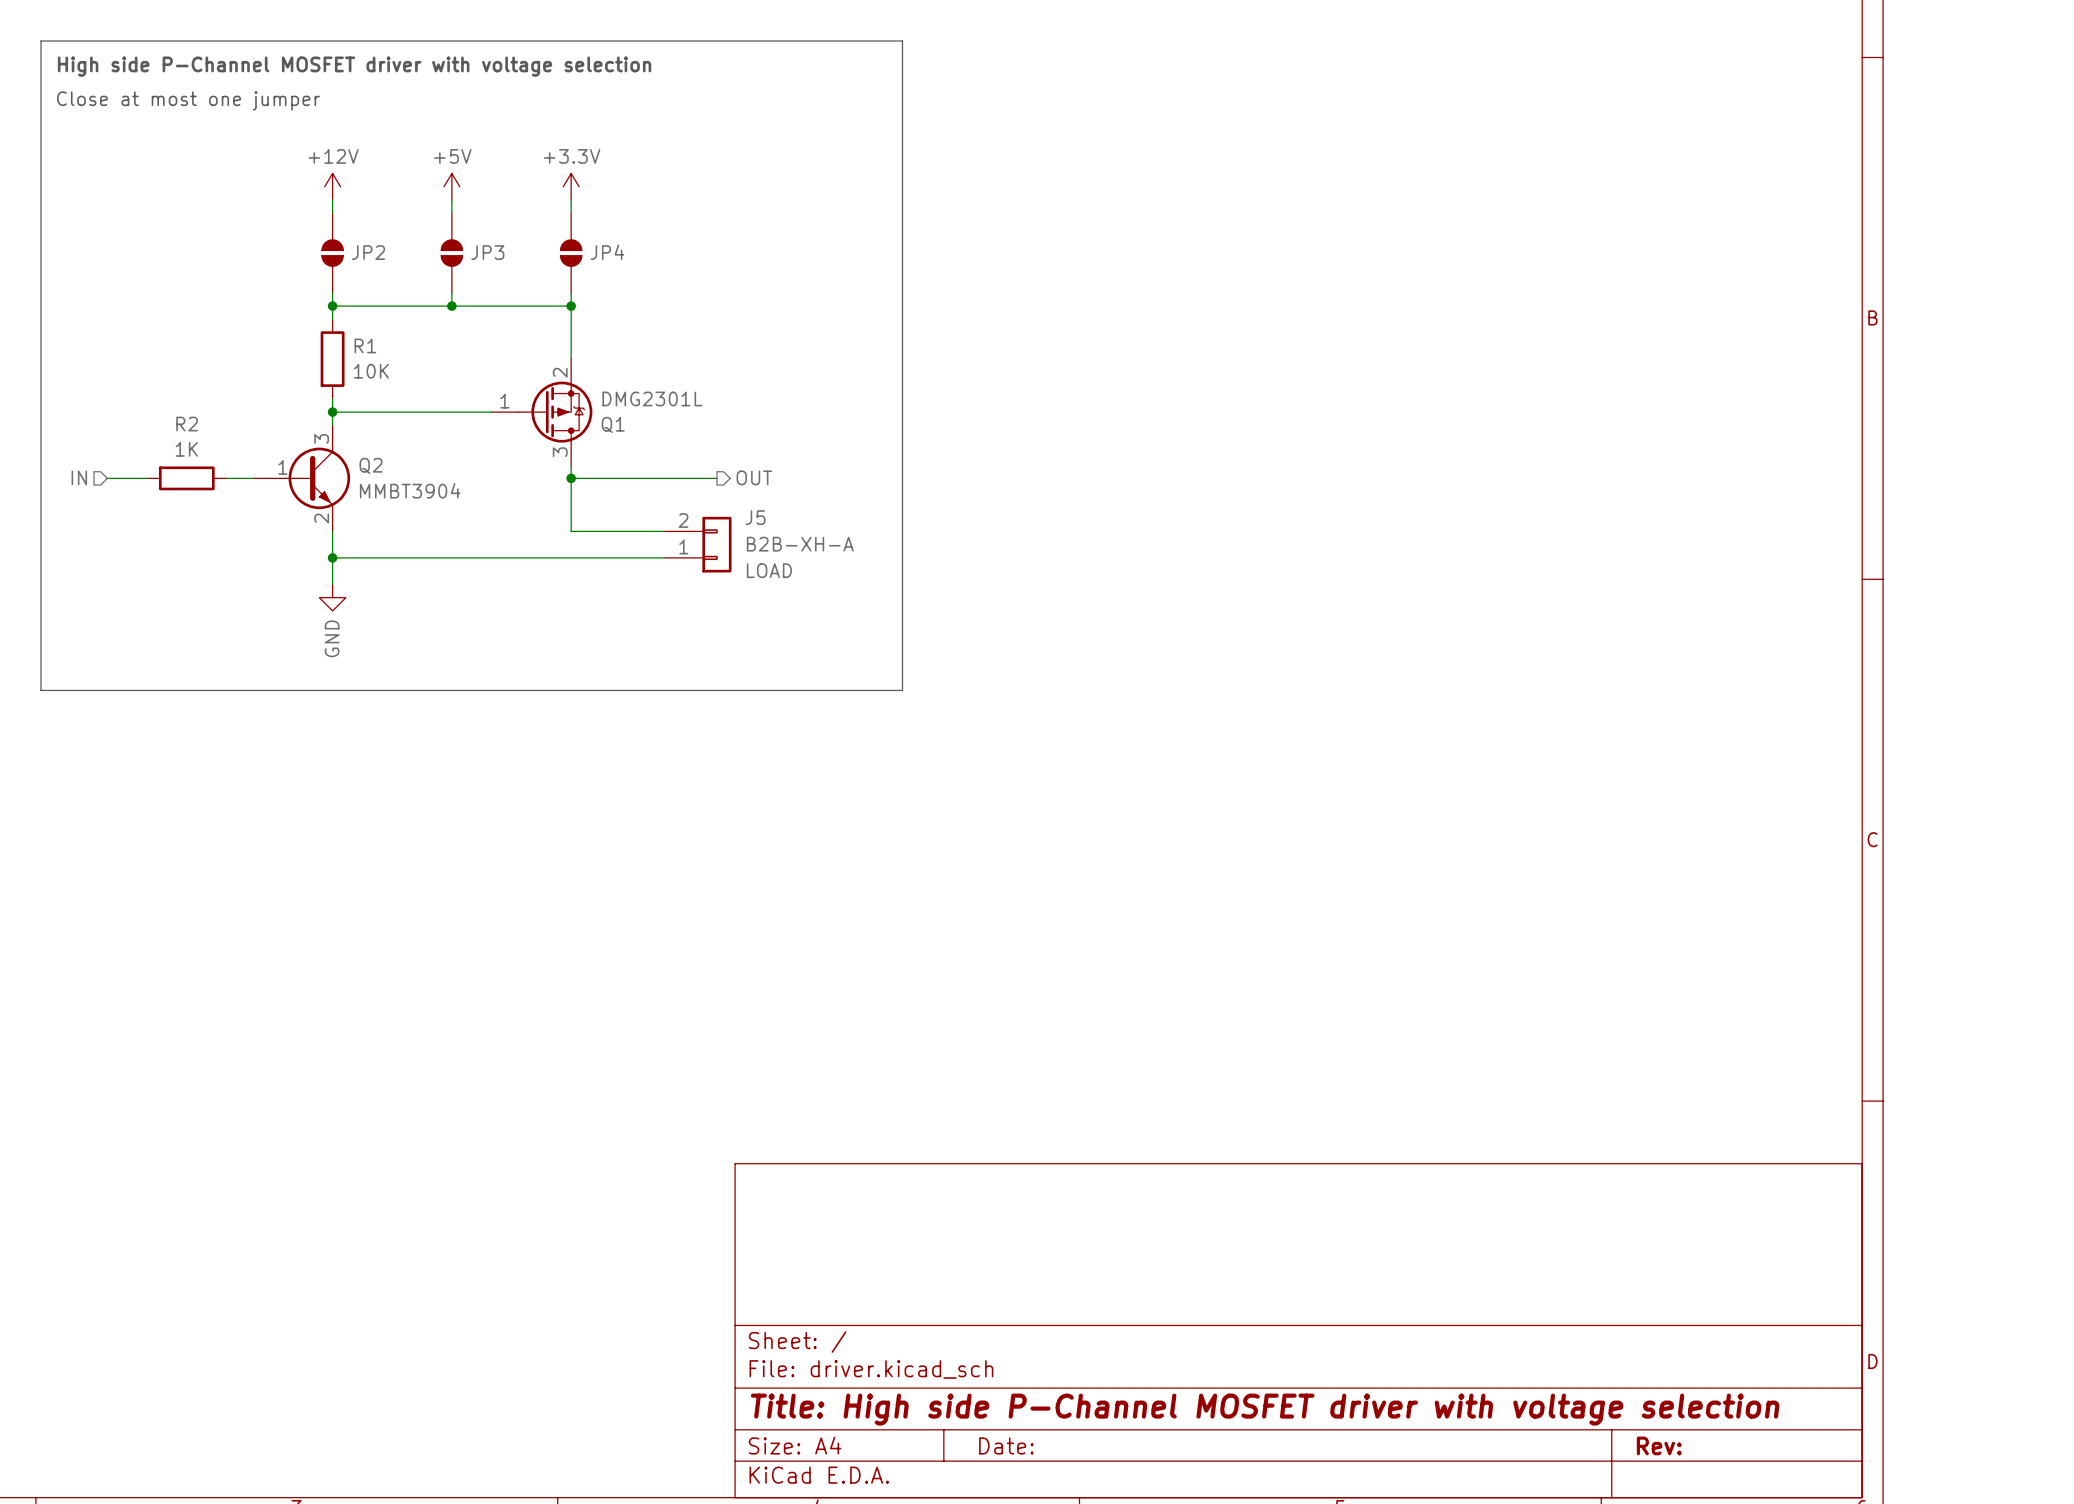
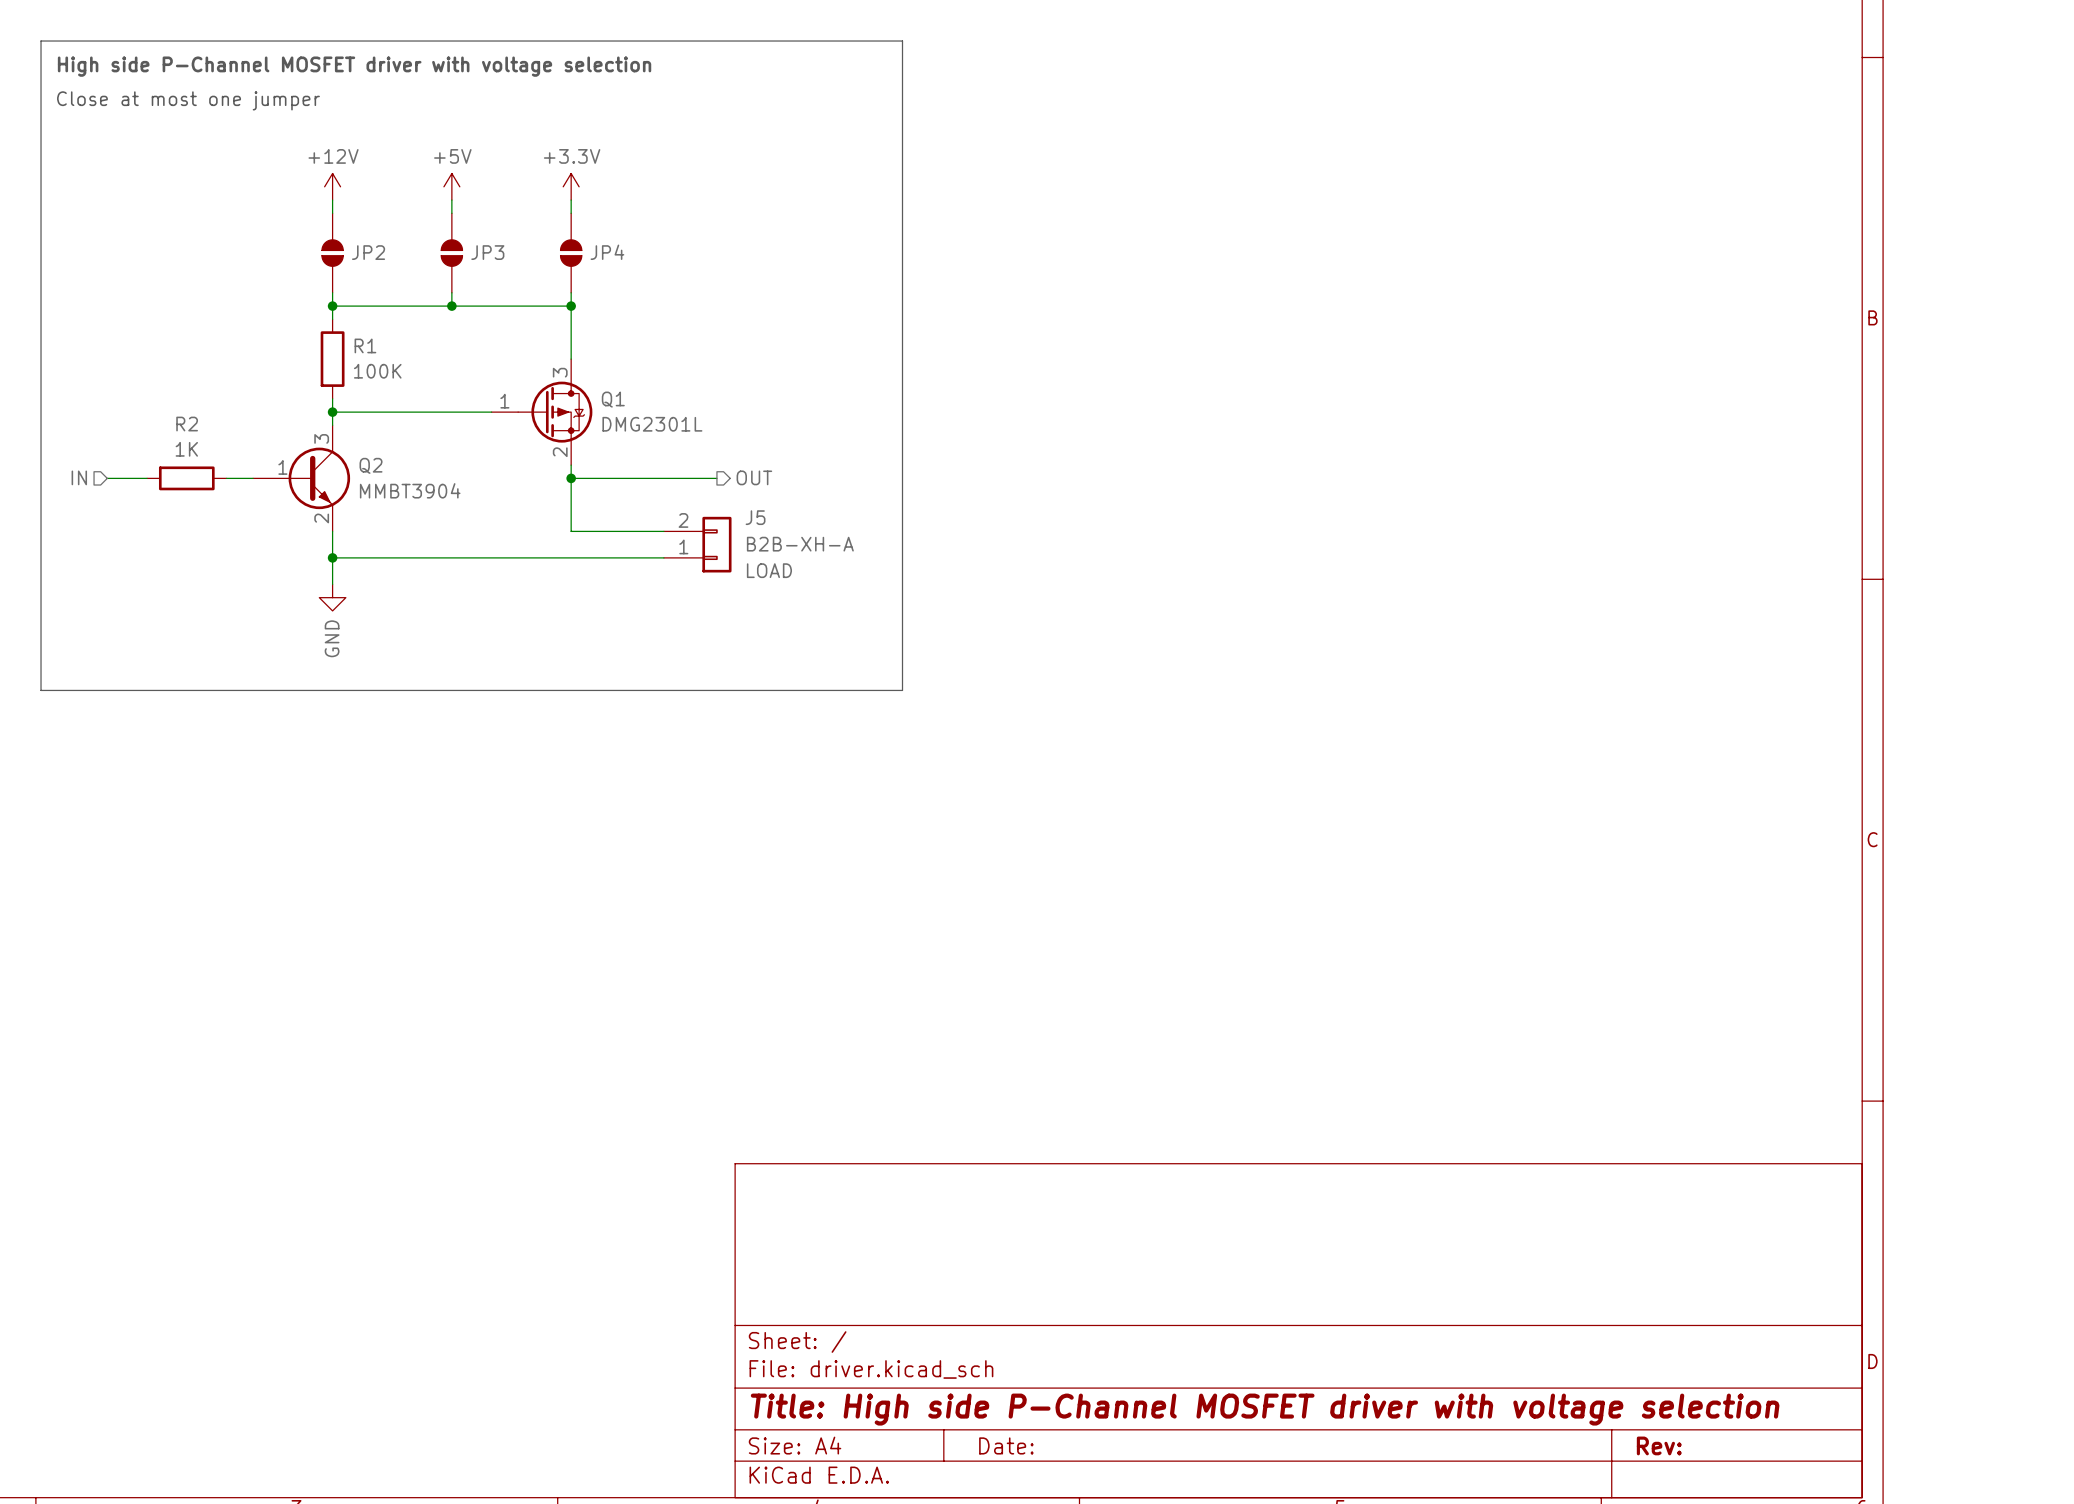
R1 value: 10K (371, 371) -> 100K (377, 371)
Q1 flip: as is (555, 412) -> up-down (555, 412)

